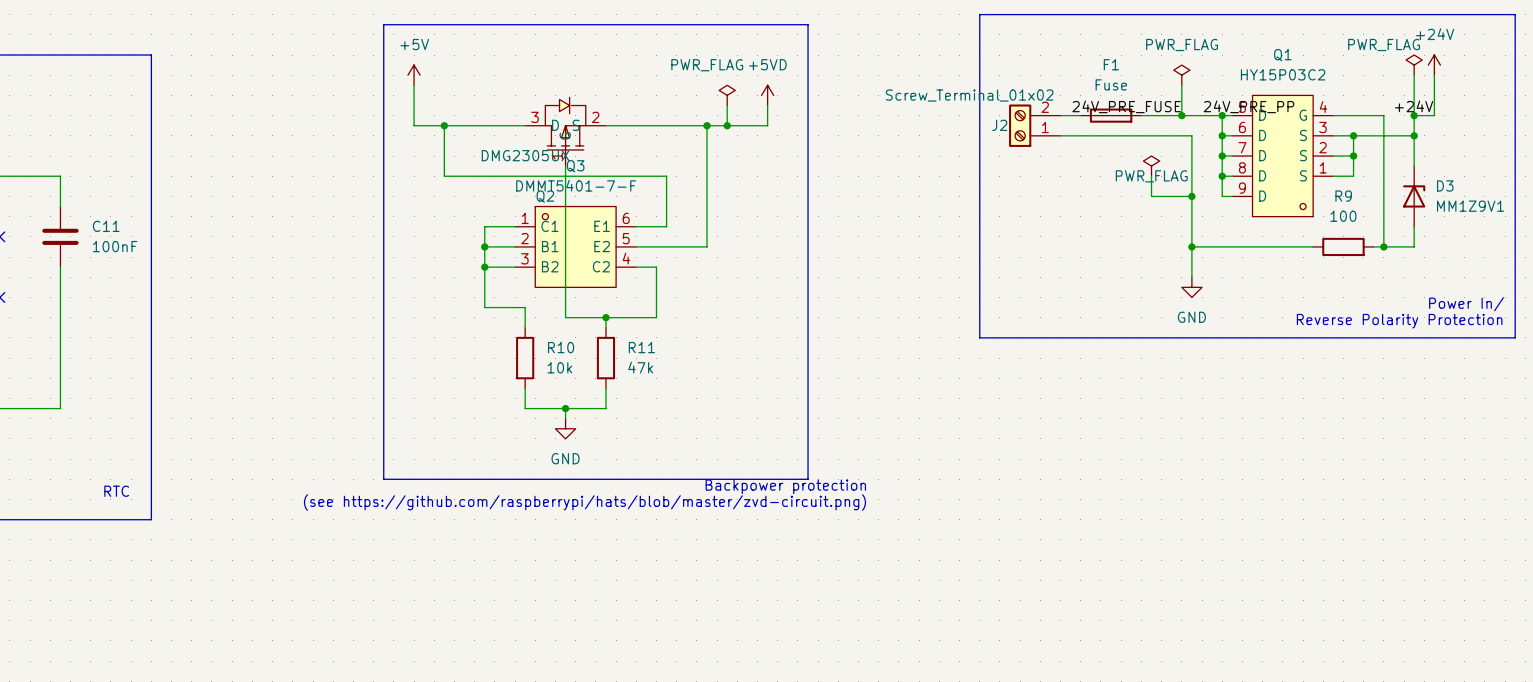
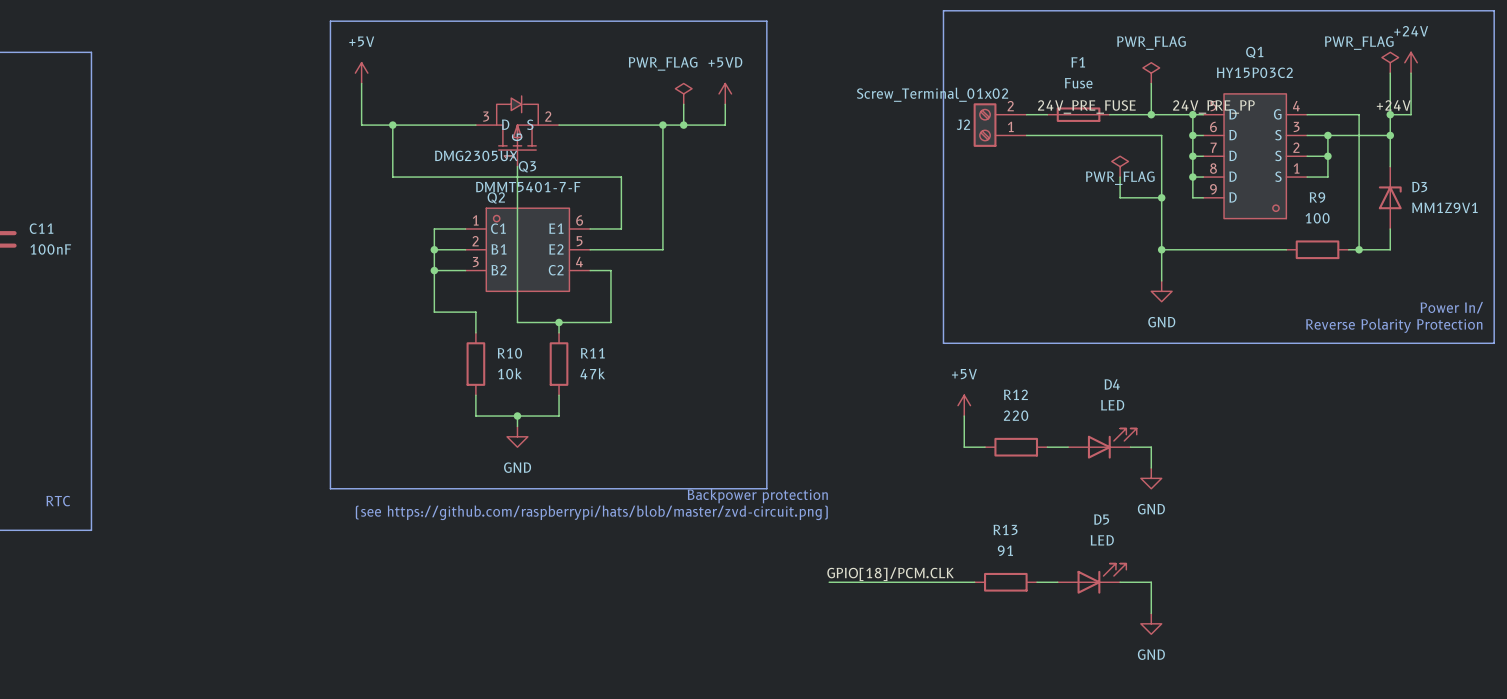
power symbol: none -> +5V (964, 405)
wire: none -> (964, 416) (964, 447) (985, 447)
D4: none -> LED (1102, 443)
R12: none -> 220 (1016, 447)
wire: none -> (1047, 447) (1068, 447)
wire: none -> (1130, 447) (1151, 447) (1151, 467)
power symbol: none -> GND (1151, 478)
label: none -> GPIO[18]/PCM.CLK (890, 574)
D5: none -> LED (1092, 578)
wire: none -> (829, 582) (974, 582)
R13: none -> 91 (1005, 582)
wire: none -> (1036, 582) (1057, 582)
wire: none -> (1120, 582) (1151, 582) (1151, 613)
power symbol: none -> GND (1151, 623)

